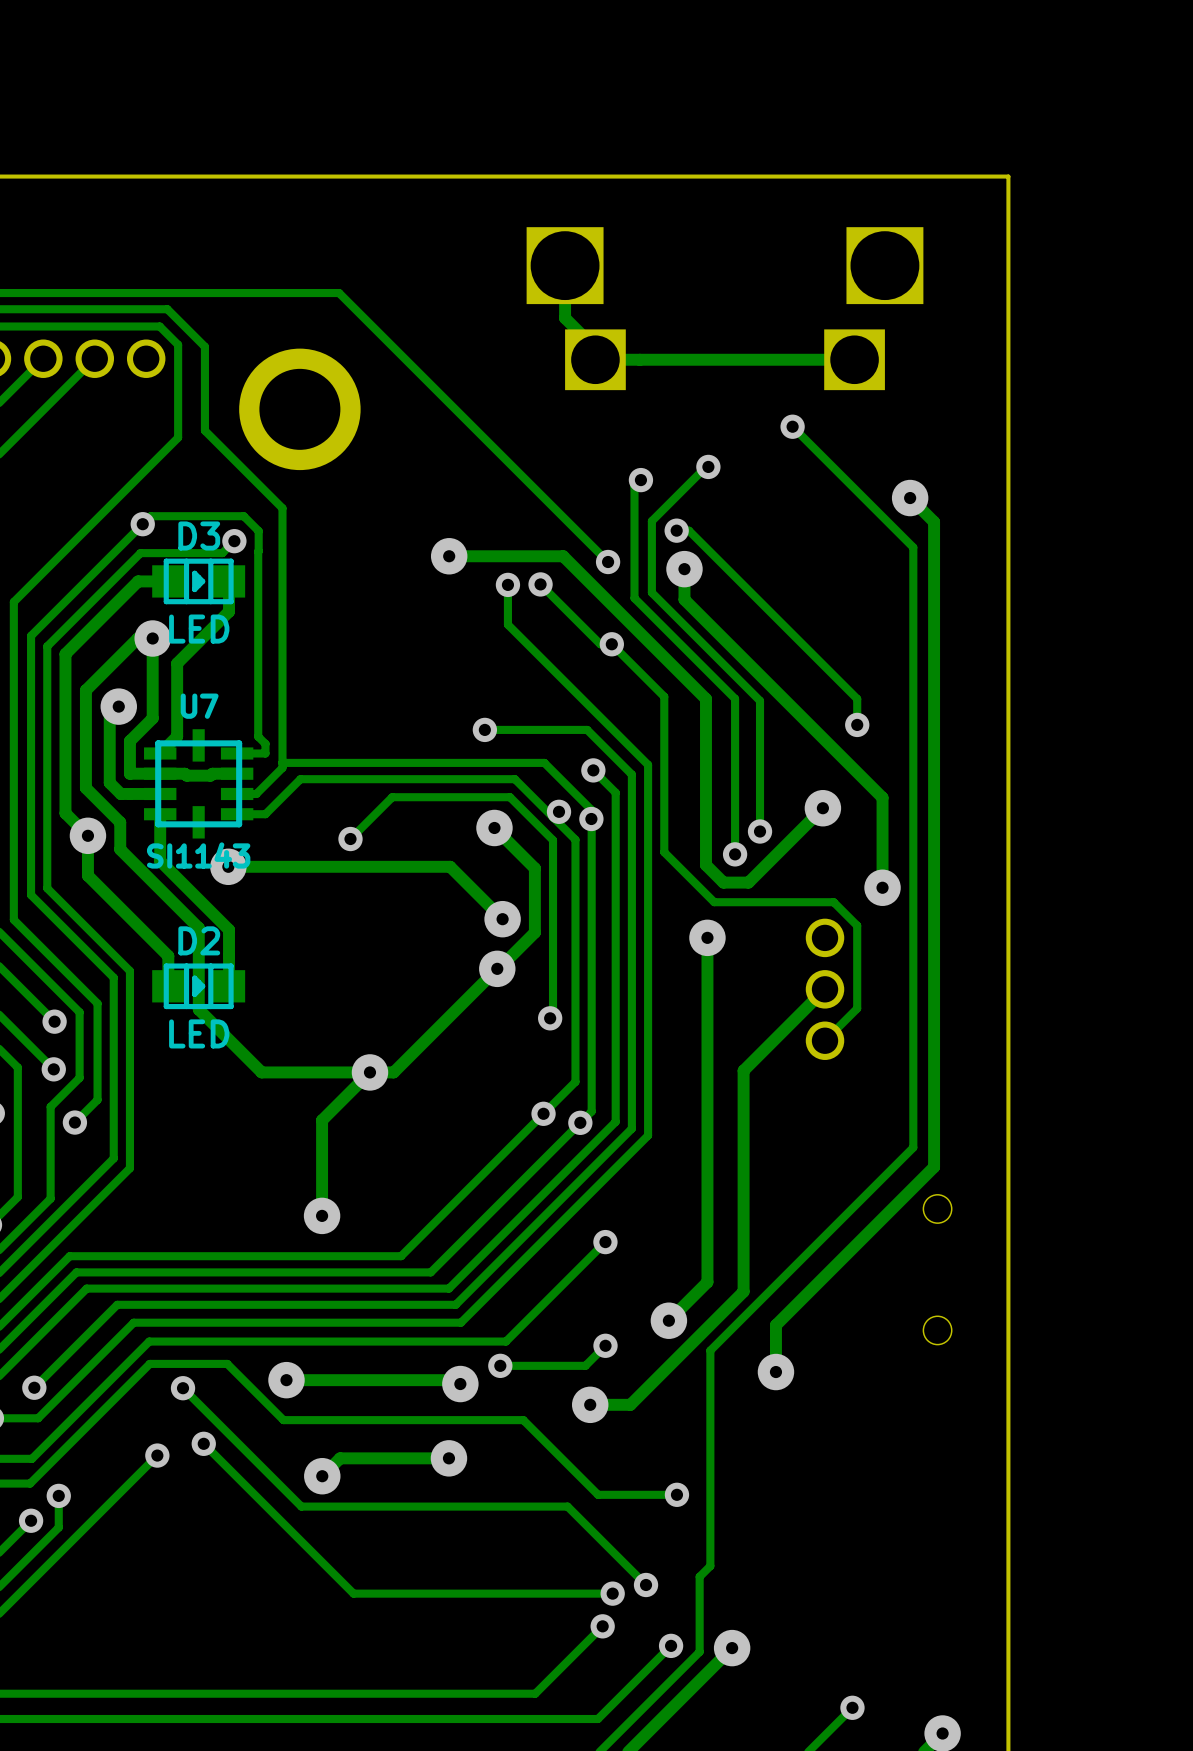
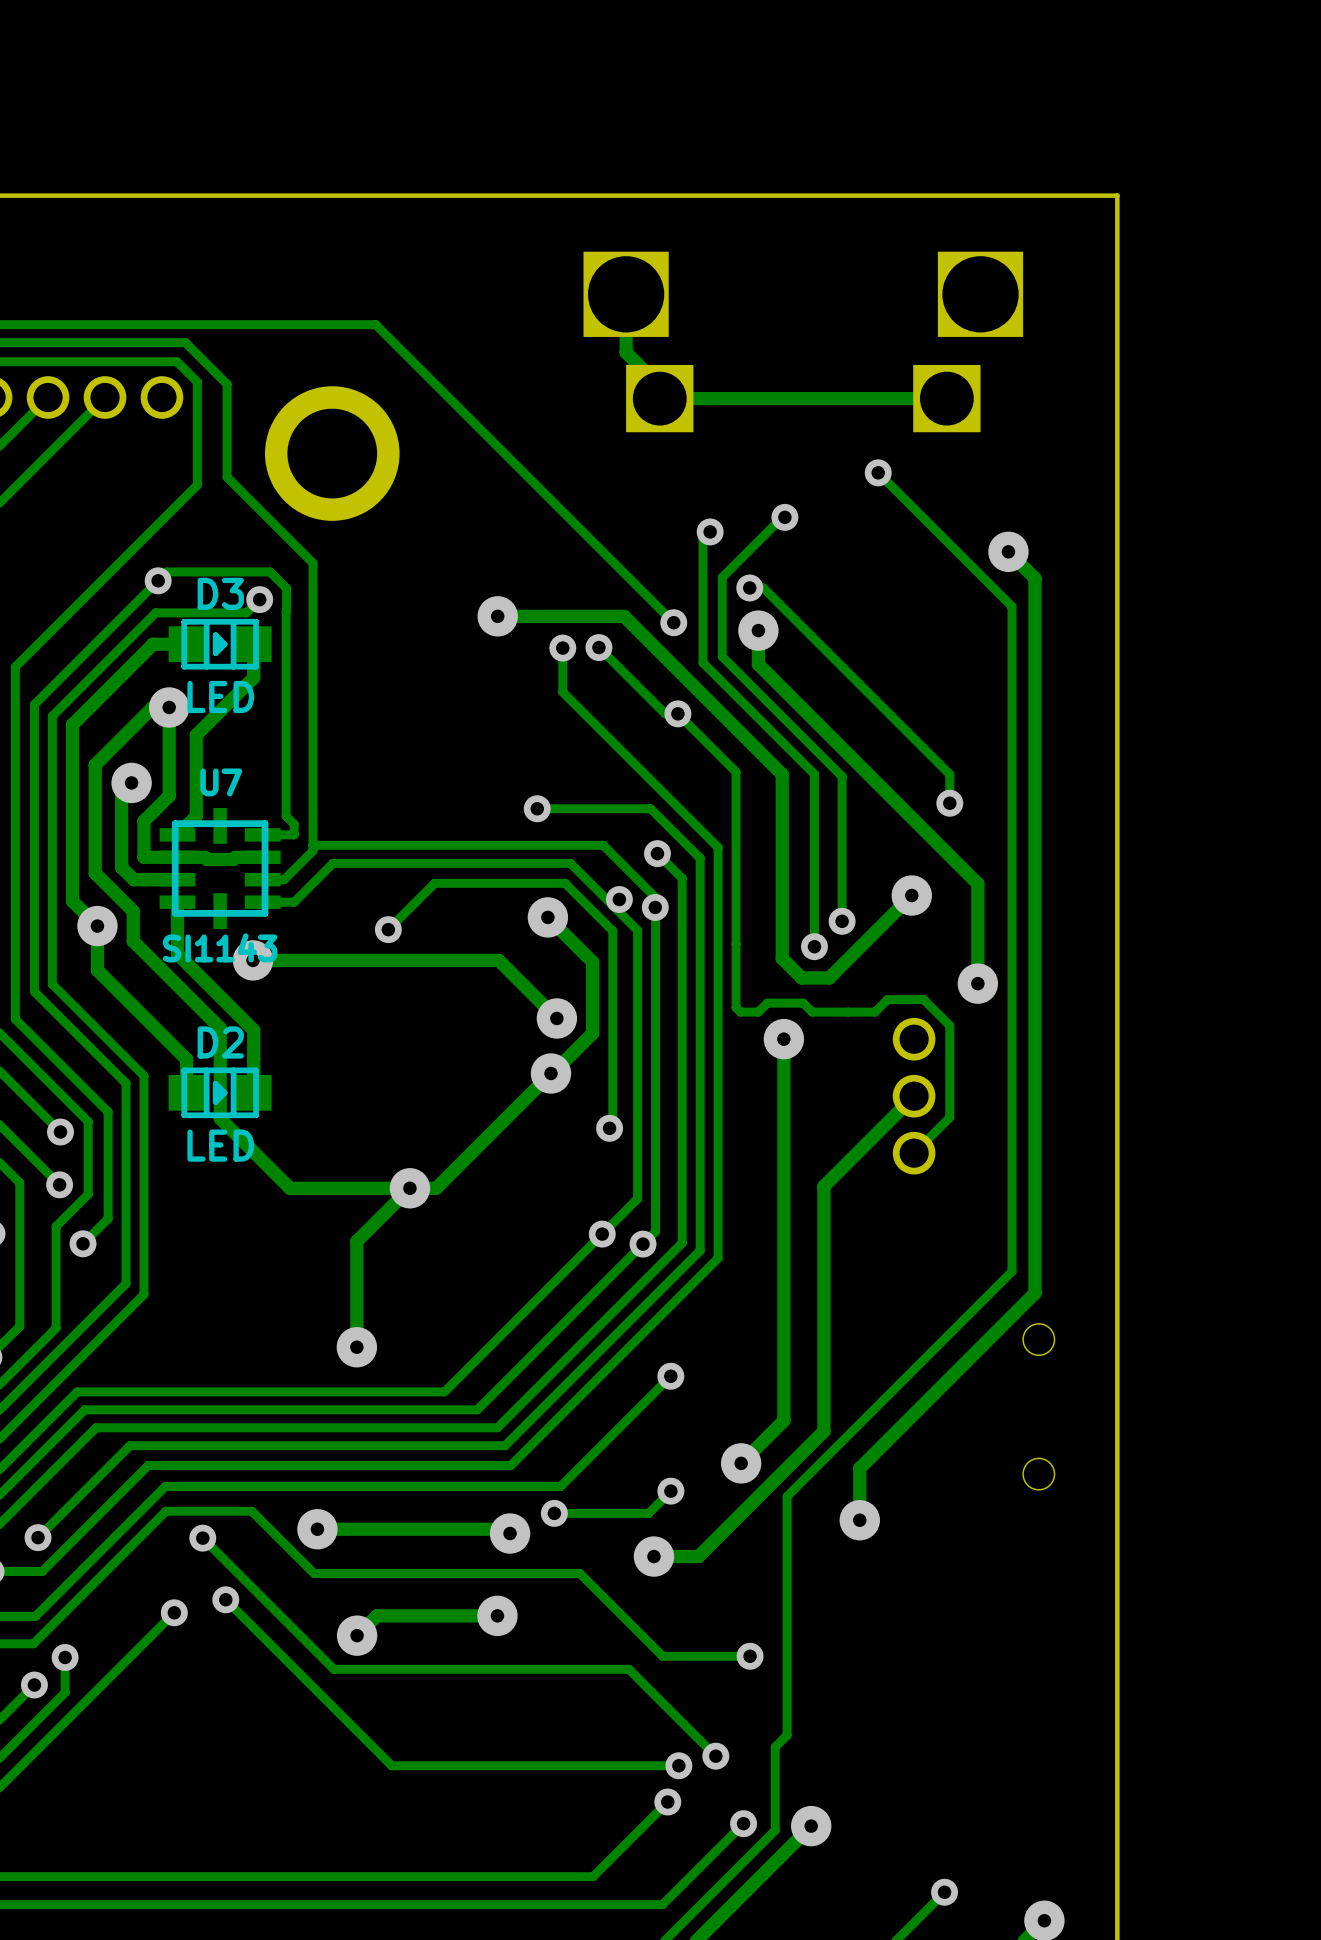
track: (664, 852) (714, 902) (800, 902) -> (736, 944) (736, 1007) (740, 1012) (758, 1012) (767, 1003) (803, 1003) (812, 1012) (875, 1012) (887, 999)

